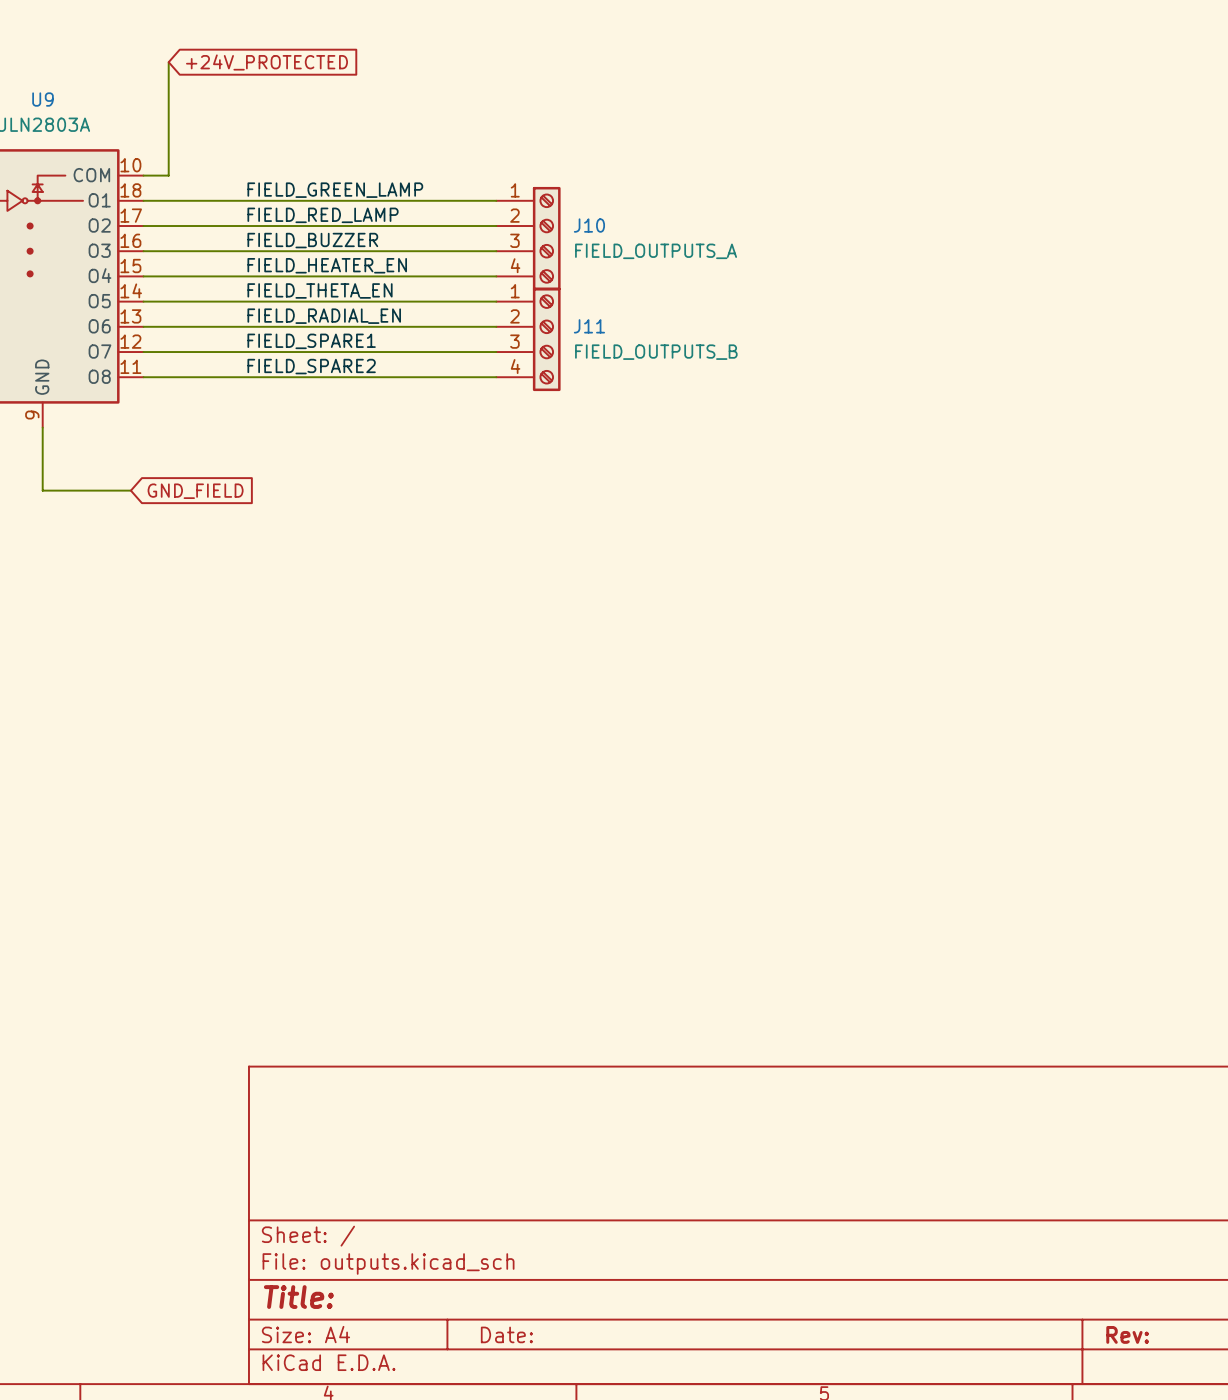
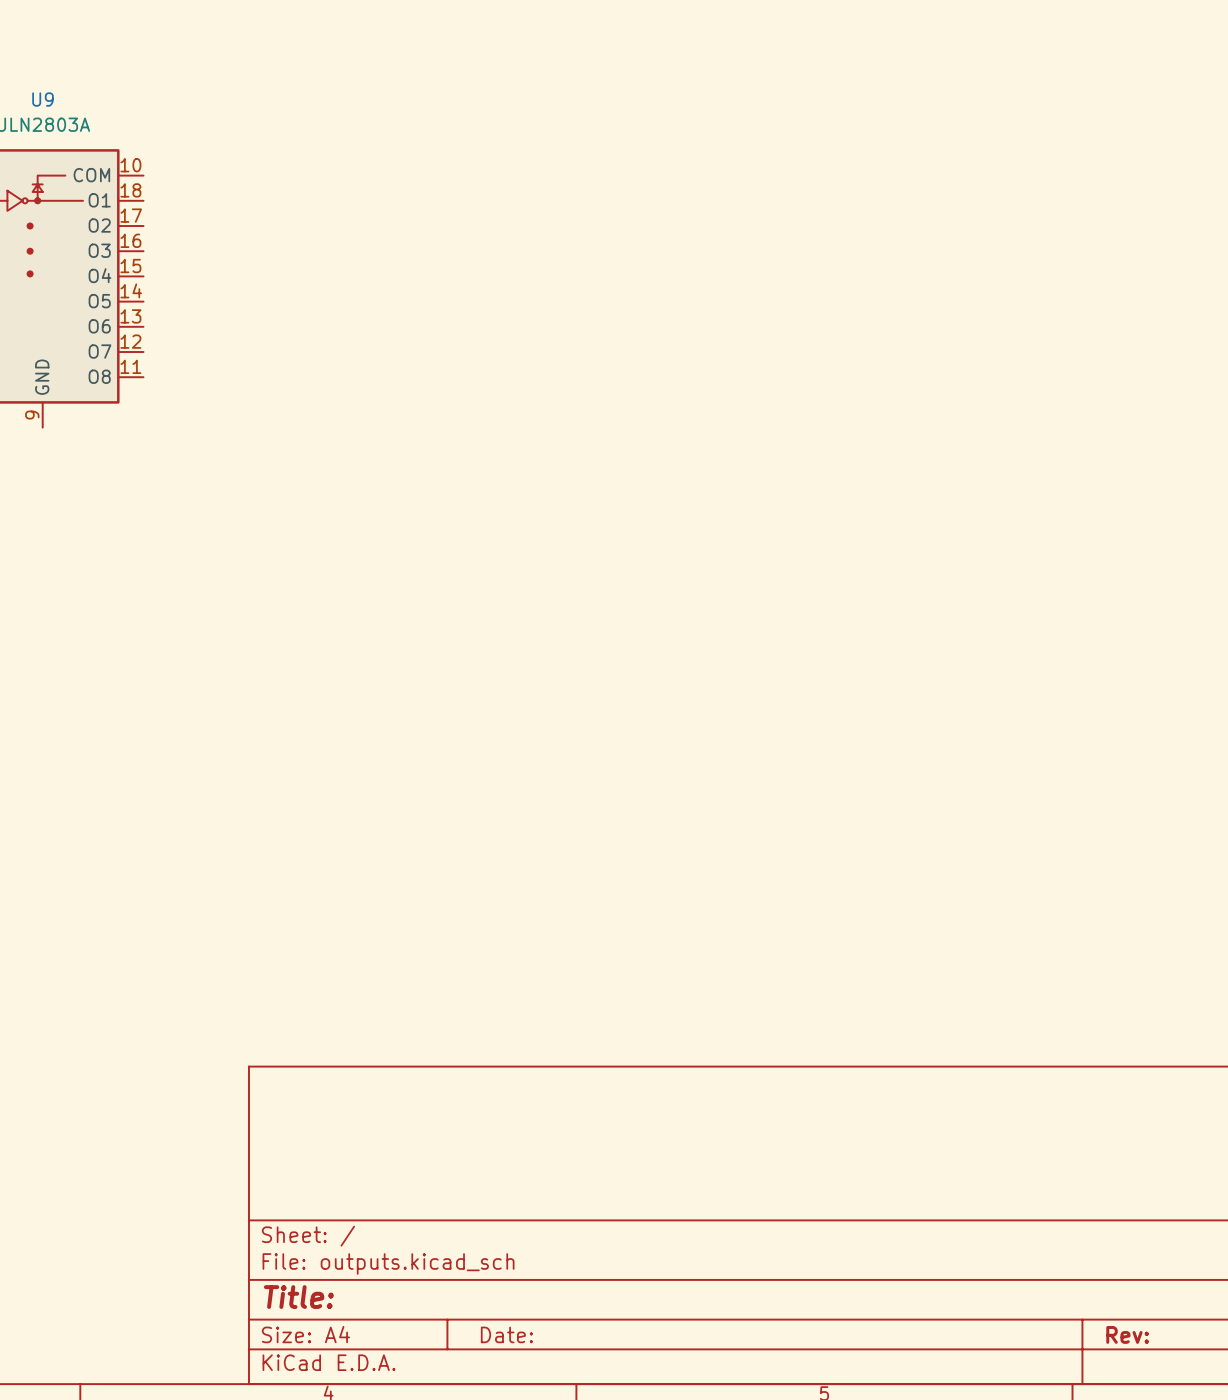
wire: (168, 62) (168, 175) (143, 175) -> none
global label: +24V_PROTECTED (266, 62) -> none
label: FIELD_GREEN_LAMP (335, 190) -> none
wire: (143, 200) (496, 200) -> none
label: FIELD_RED_LAMP (323, 215) -> none
wire: (143, 226) (496, 226) -> none
J10: FIELD_OUTPUTS_A (528, 238) -> none
label: FIELD_BUZZER (312, 240) -> none
wire: (143, 251) (496, 251) -> none
label: FIELD_HEATER_EN (327, 265) -> none
wire: (143, 276) (496, 276) -> none
label: FIELD_THETA_EN (320, 290) -> none
wire: (143, 301) (496, 301) -> none
label: FIELD_RADIAL_EN (324, 316) -> none
wire: (143, 326) (496, 326) -> none
J11: FIELD_OUTPUTS_B (528, 339) -> none
label: FIELD_SPARE1 (311, 341) -> none
wire: (143, 352) (496, 352) -> none
label: FIELD_SPARE2 (311, 366) -> none
wire: (143, 377) (496, 377) -> none
wire: (42, 427) (42, 490) (130, 490) -> none
global label: GND_FIELD (195, 491) -> none

